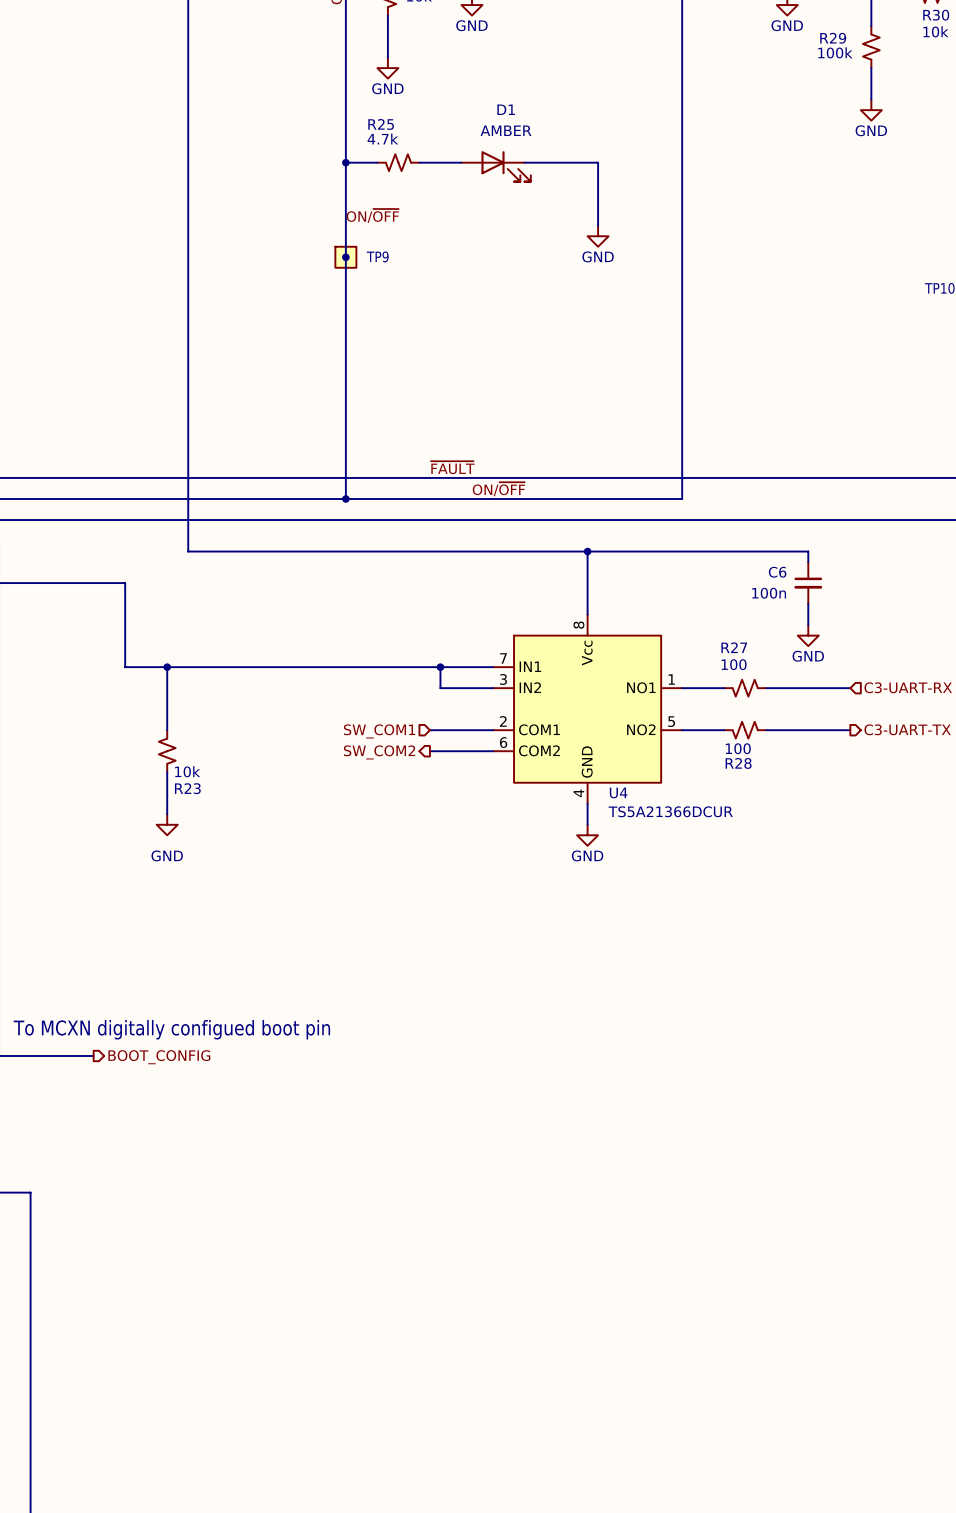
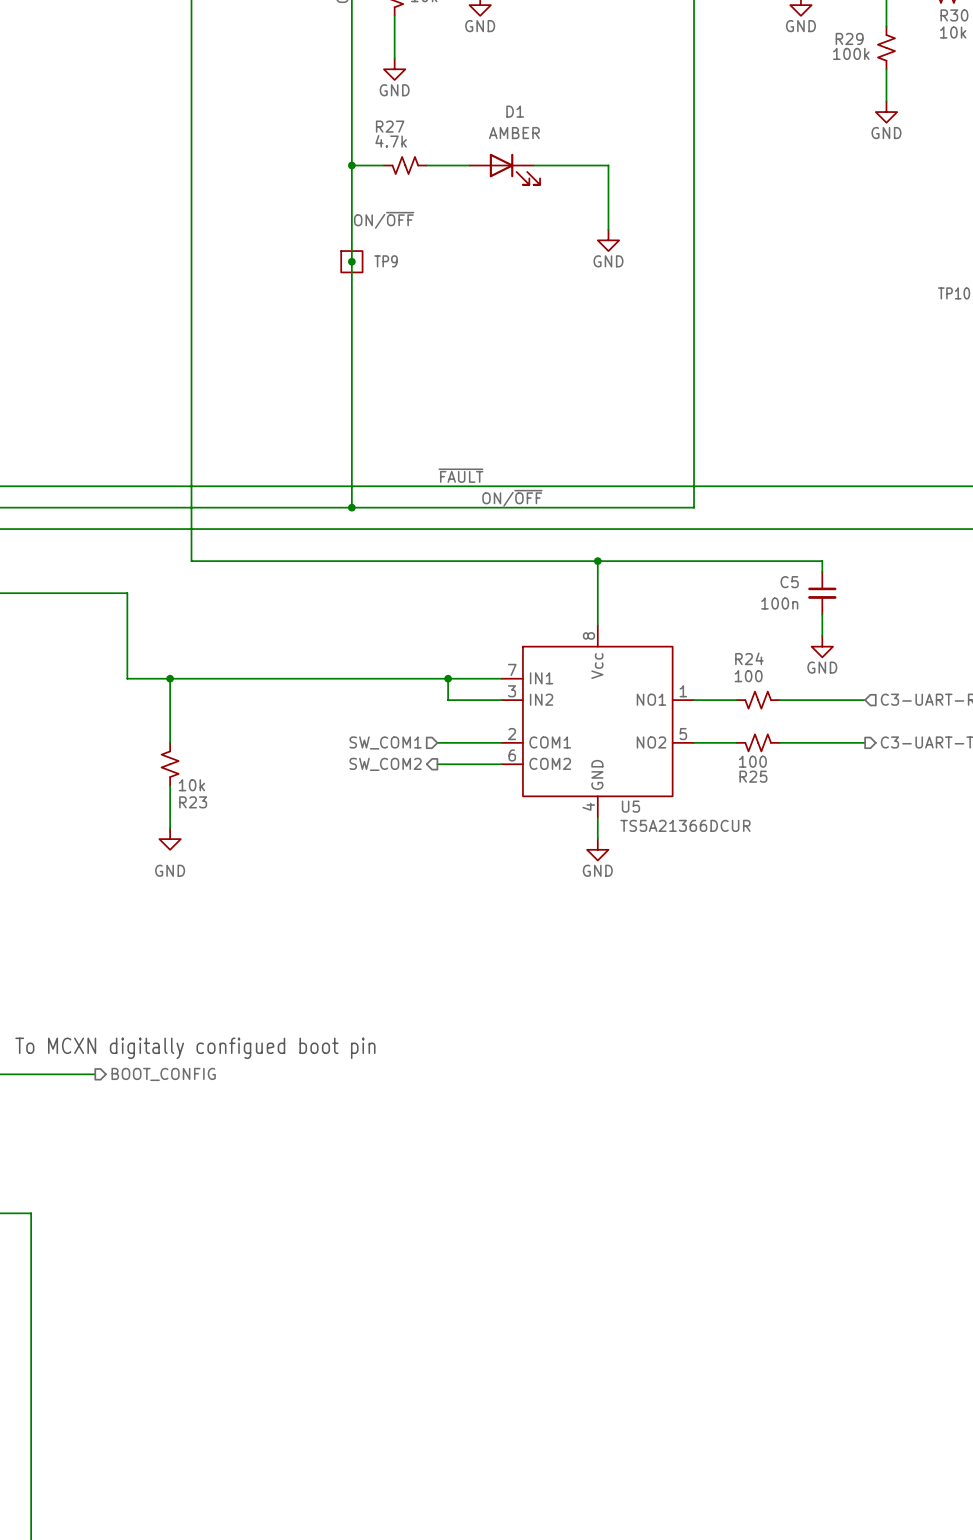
R25 name: R25 (381, 124) -> R27 (390, 126)
C6 name: C6 (777, 572) -> C5 (789, 582)
R27 name: R27 (734, 647) -> R24 (749, 658)
R28 name: R28 (738, 763) -> R25 (753, 776)
U4 name: U4 (618, 792) -> U5 (630, 806)

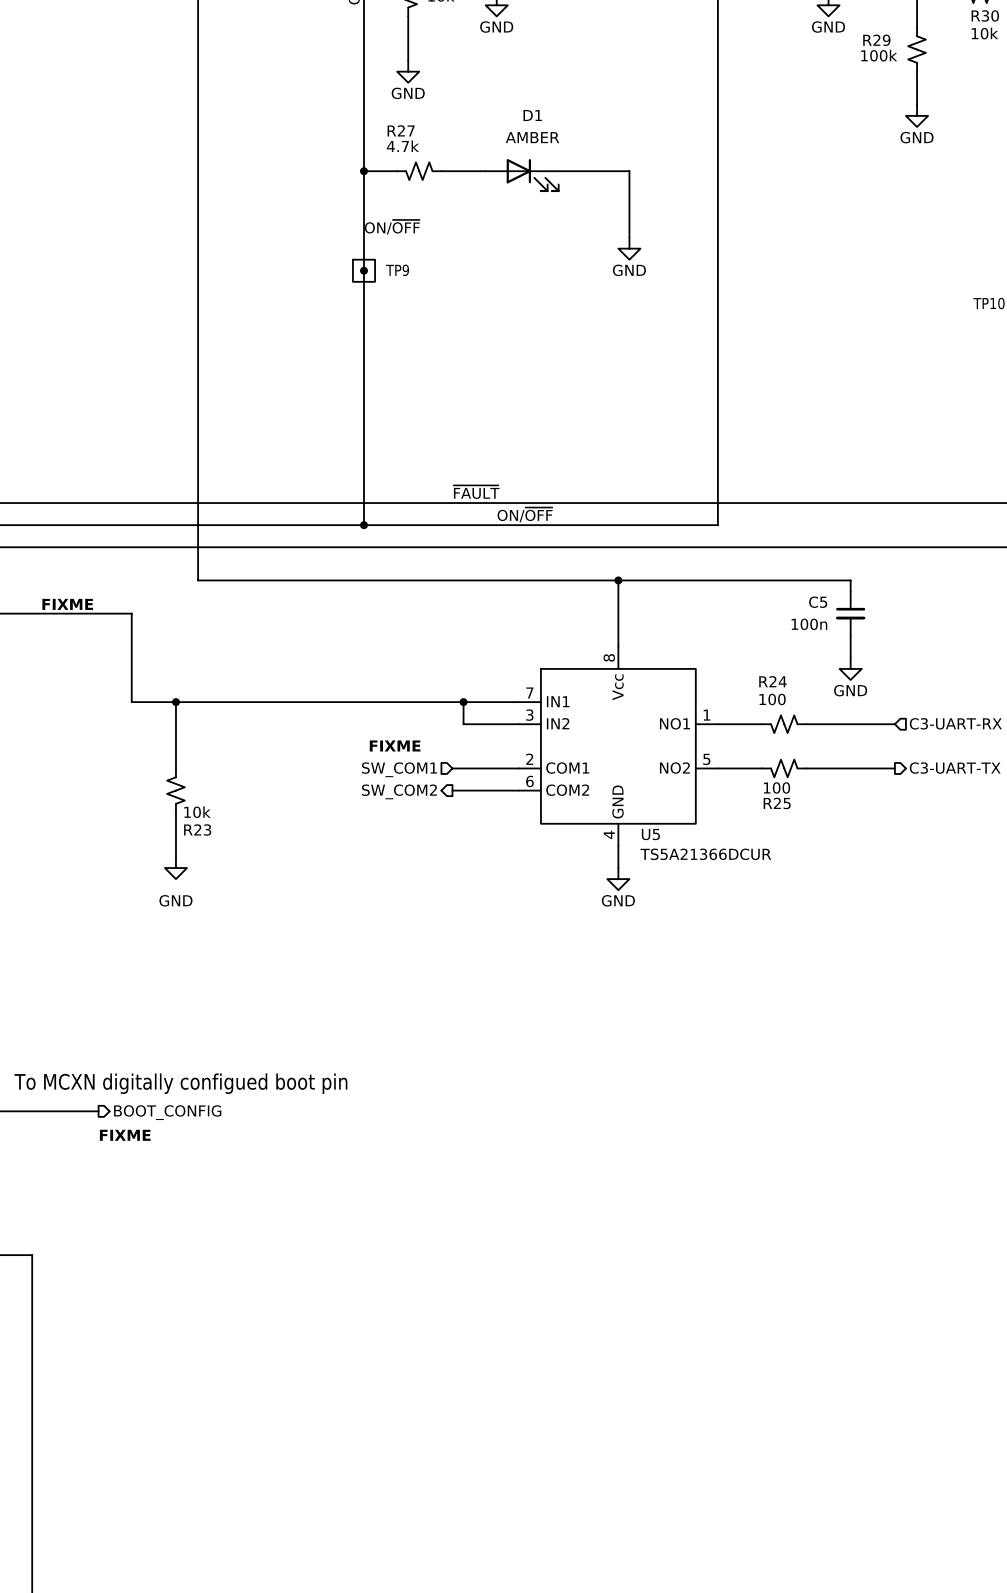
text: none -> FIXME (67, 604)
text: none -> FIXME (395, 745)
text: none -> FIXME (125, 1135)

